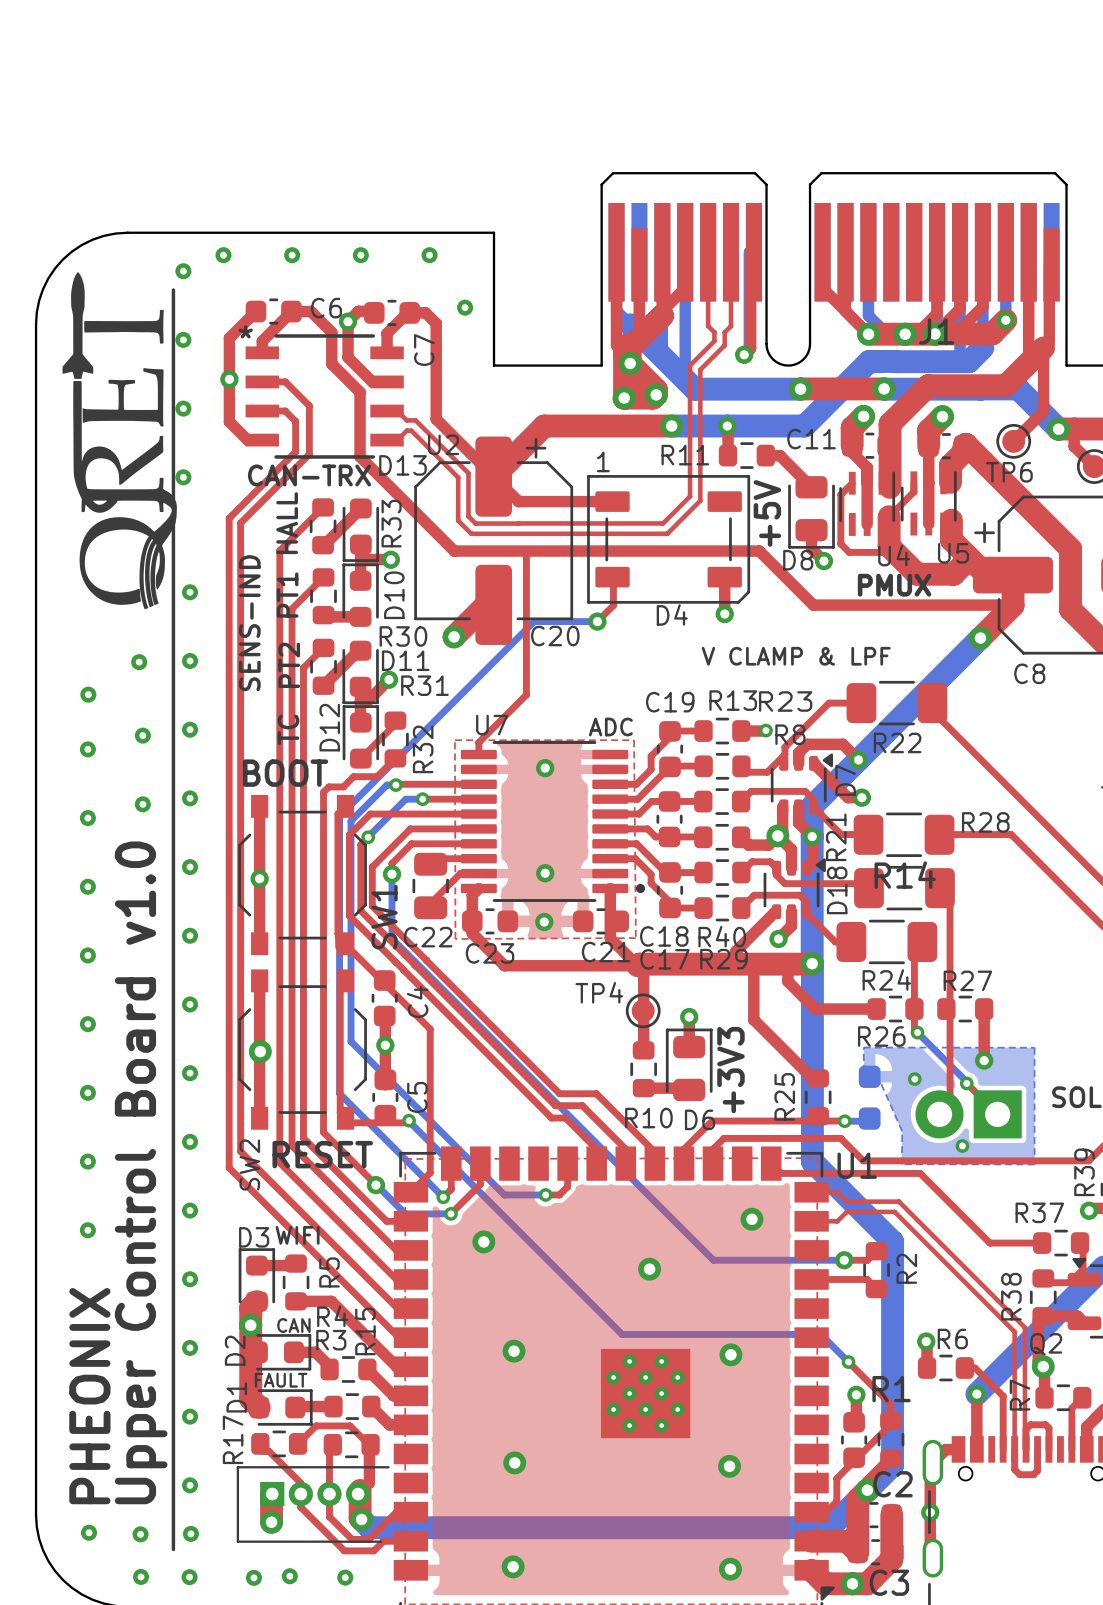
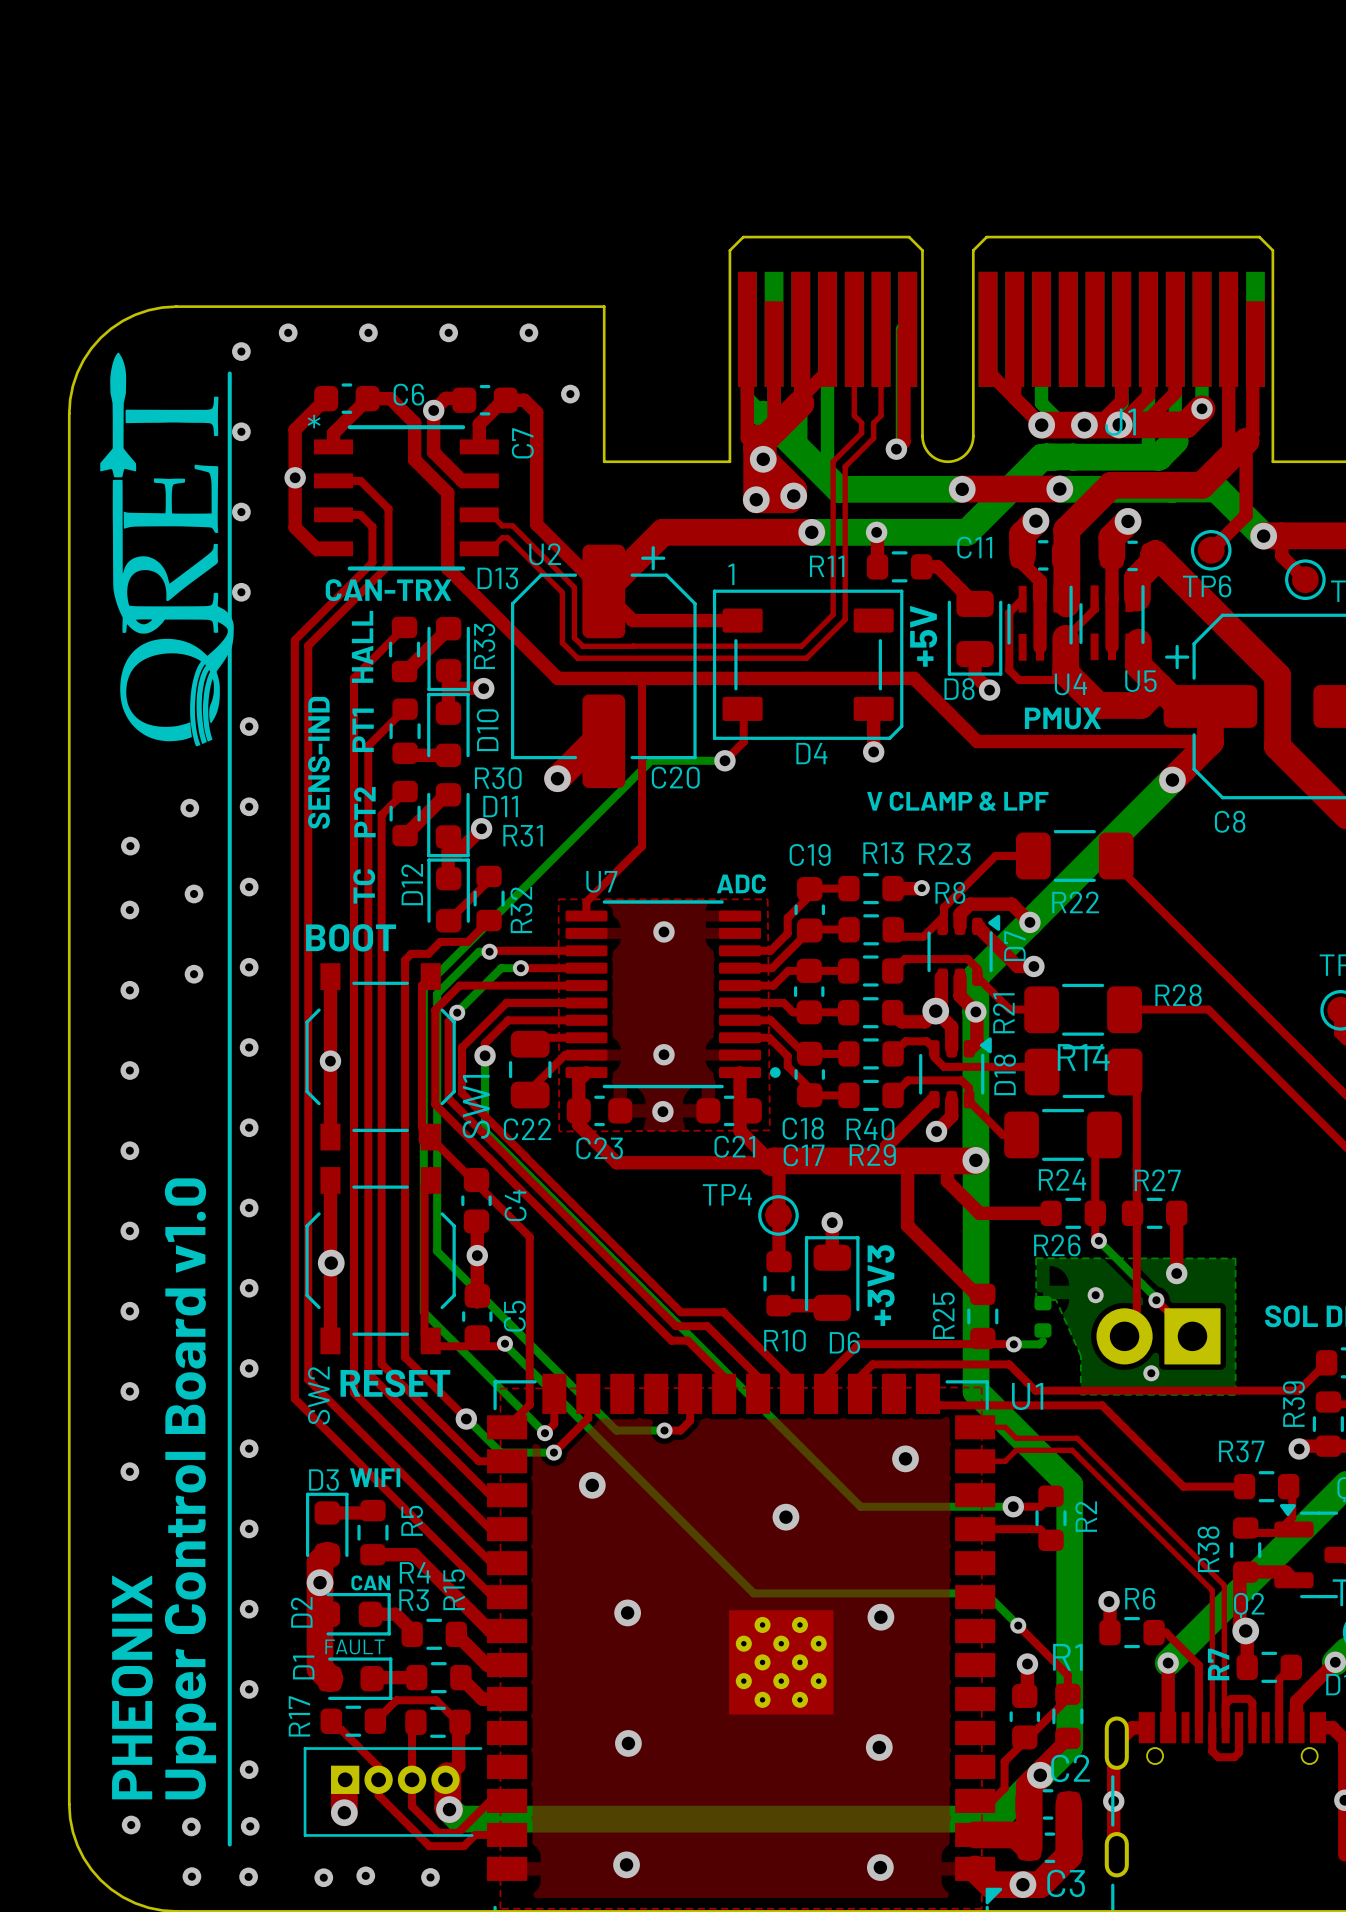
part footprint: [858, 1065, 881, 1130] -> [1034, 1295, 1052, 1338]

